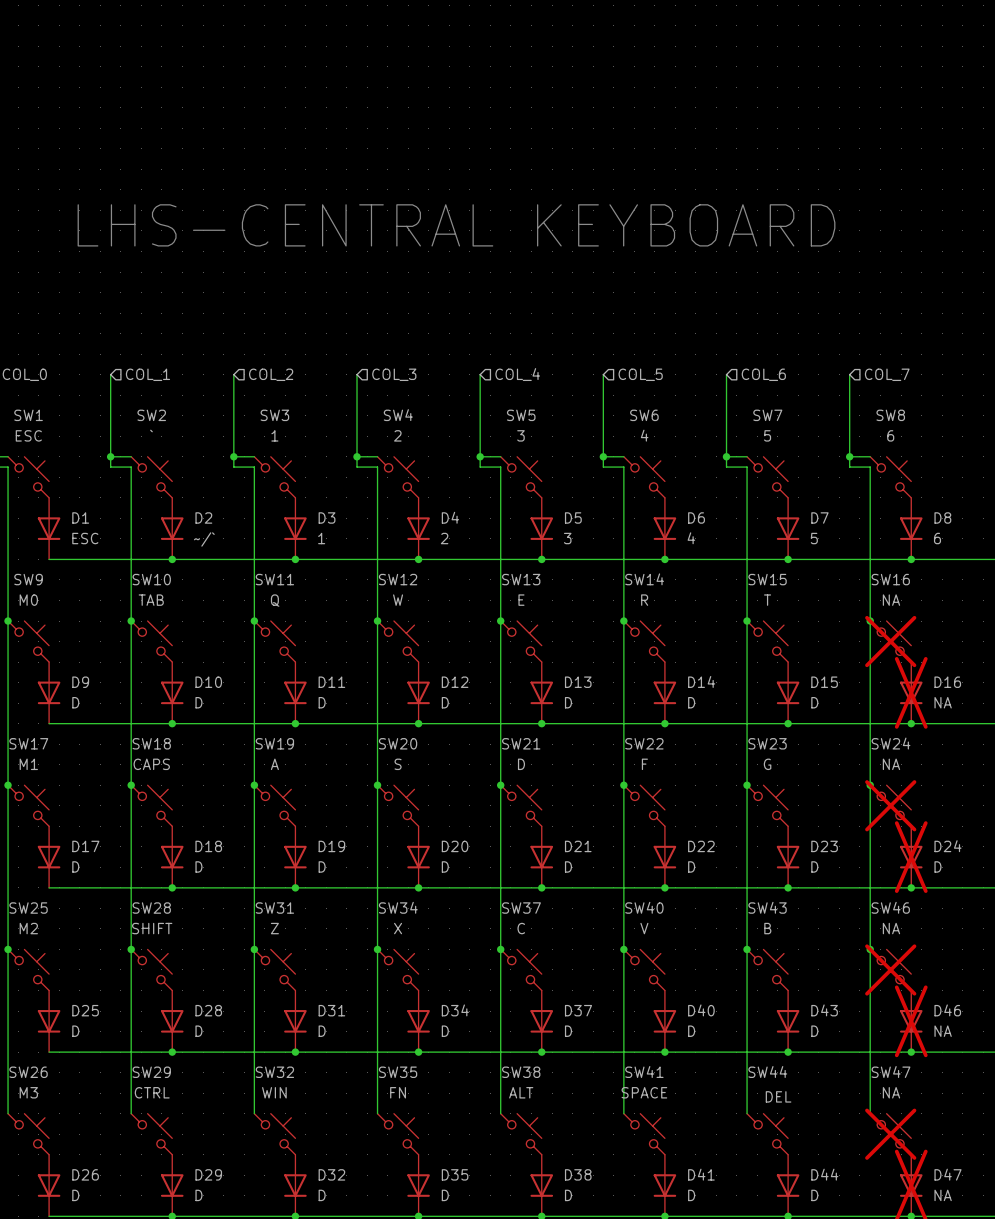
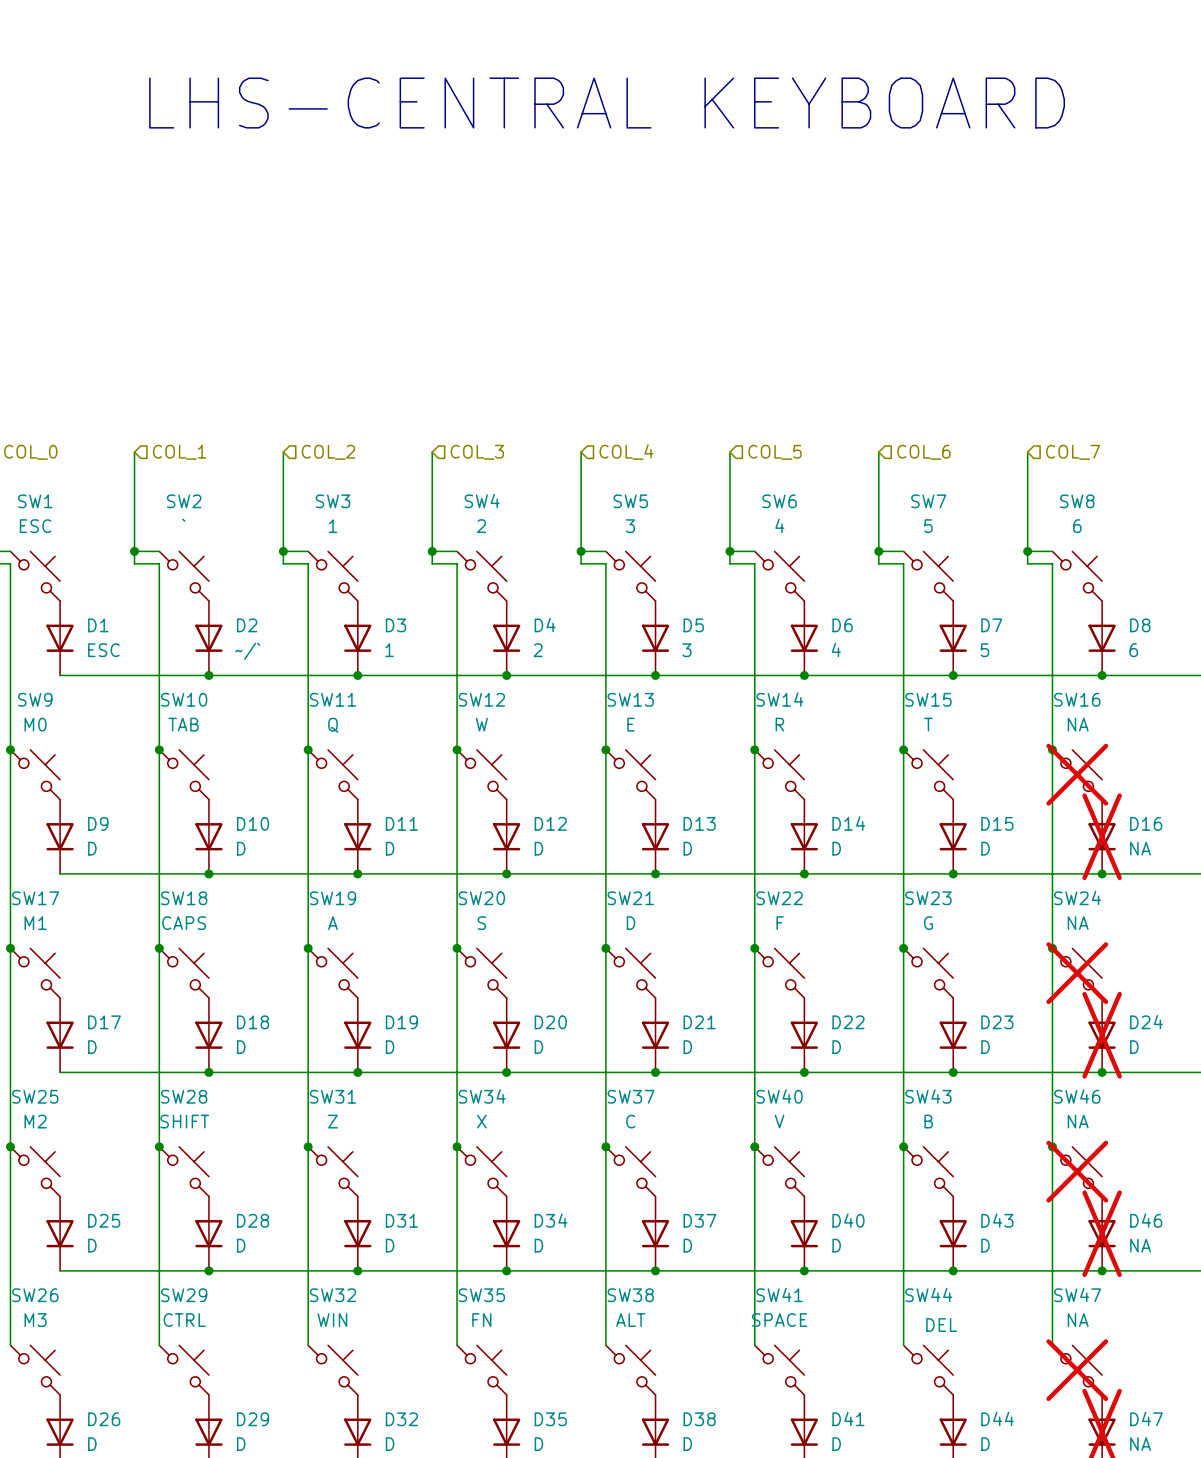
text position: LHS-CENTRAL KEYBOARD (456, 225) -> LHS-CENTRAL KEYBOARD (607, 103)

